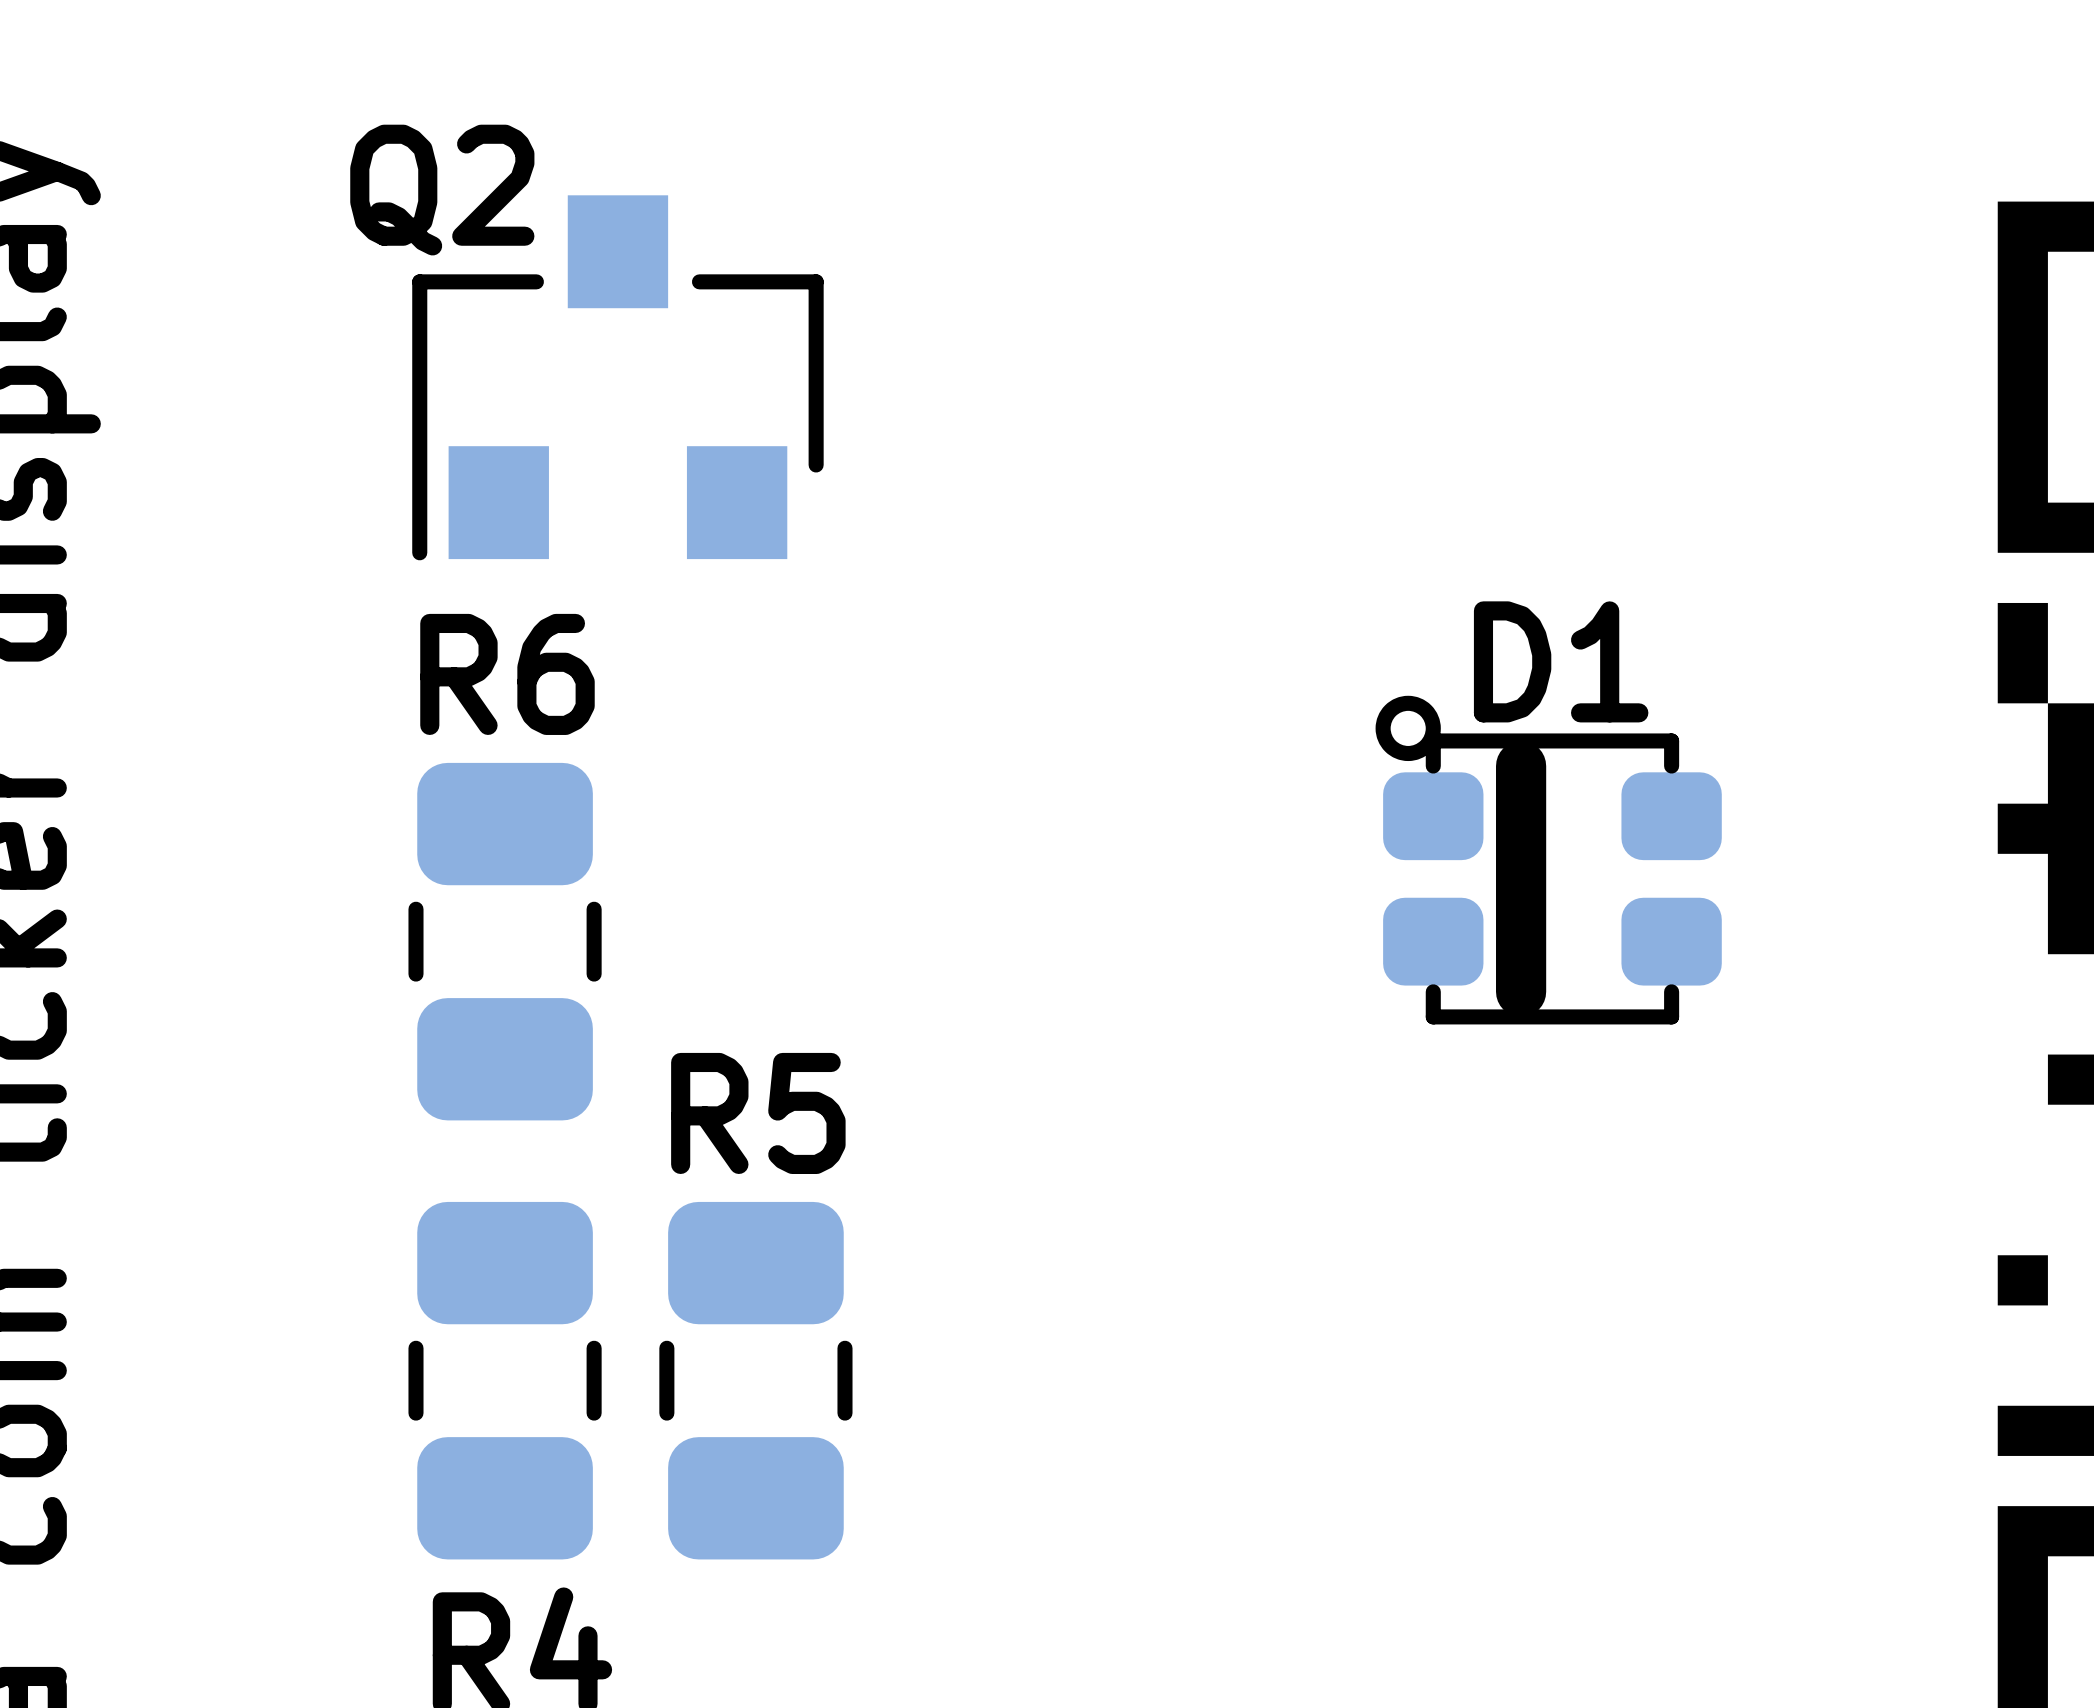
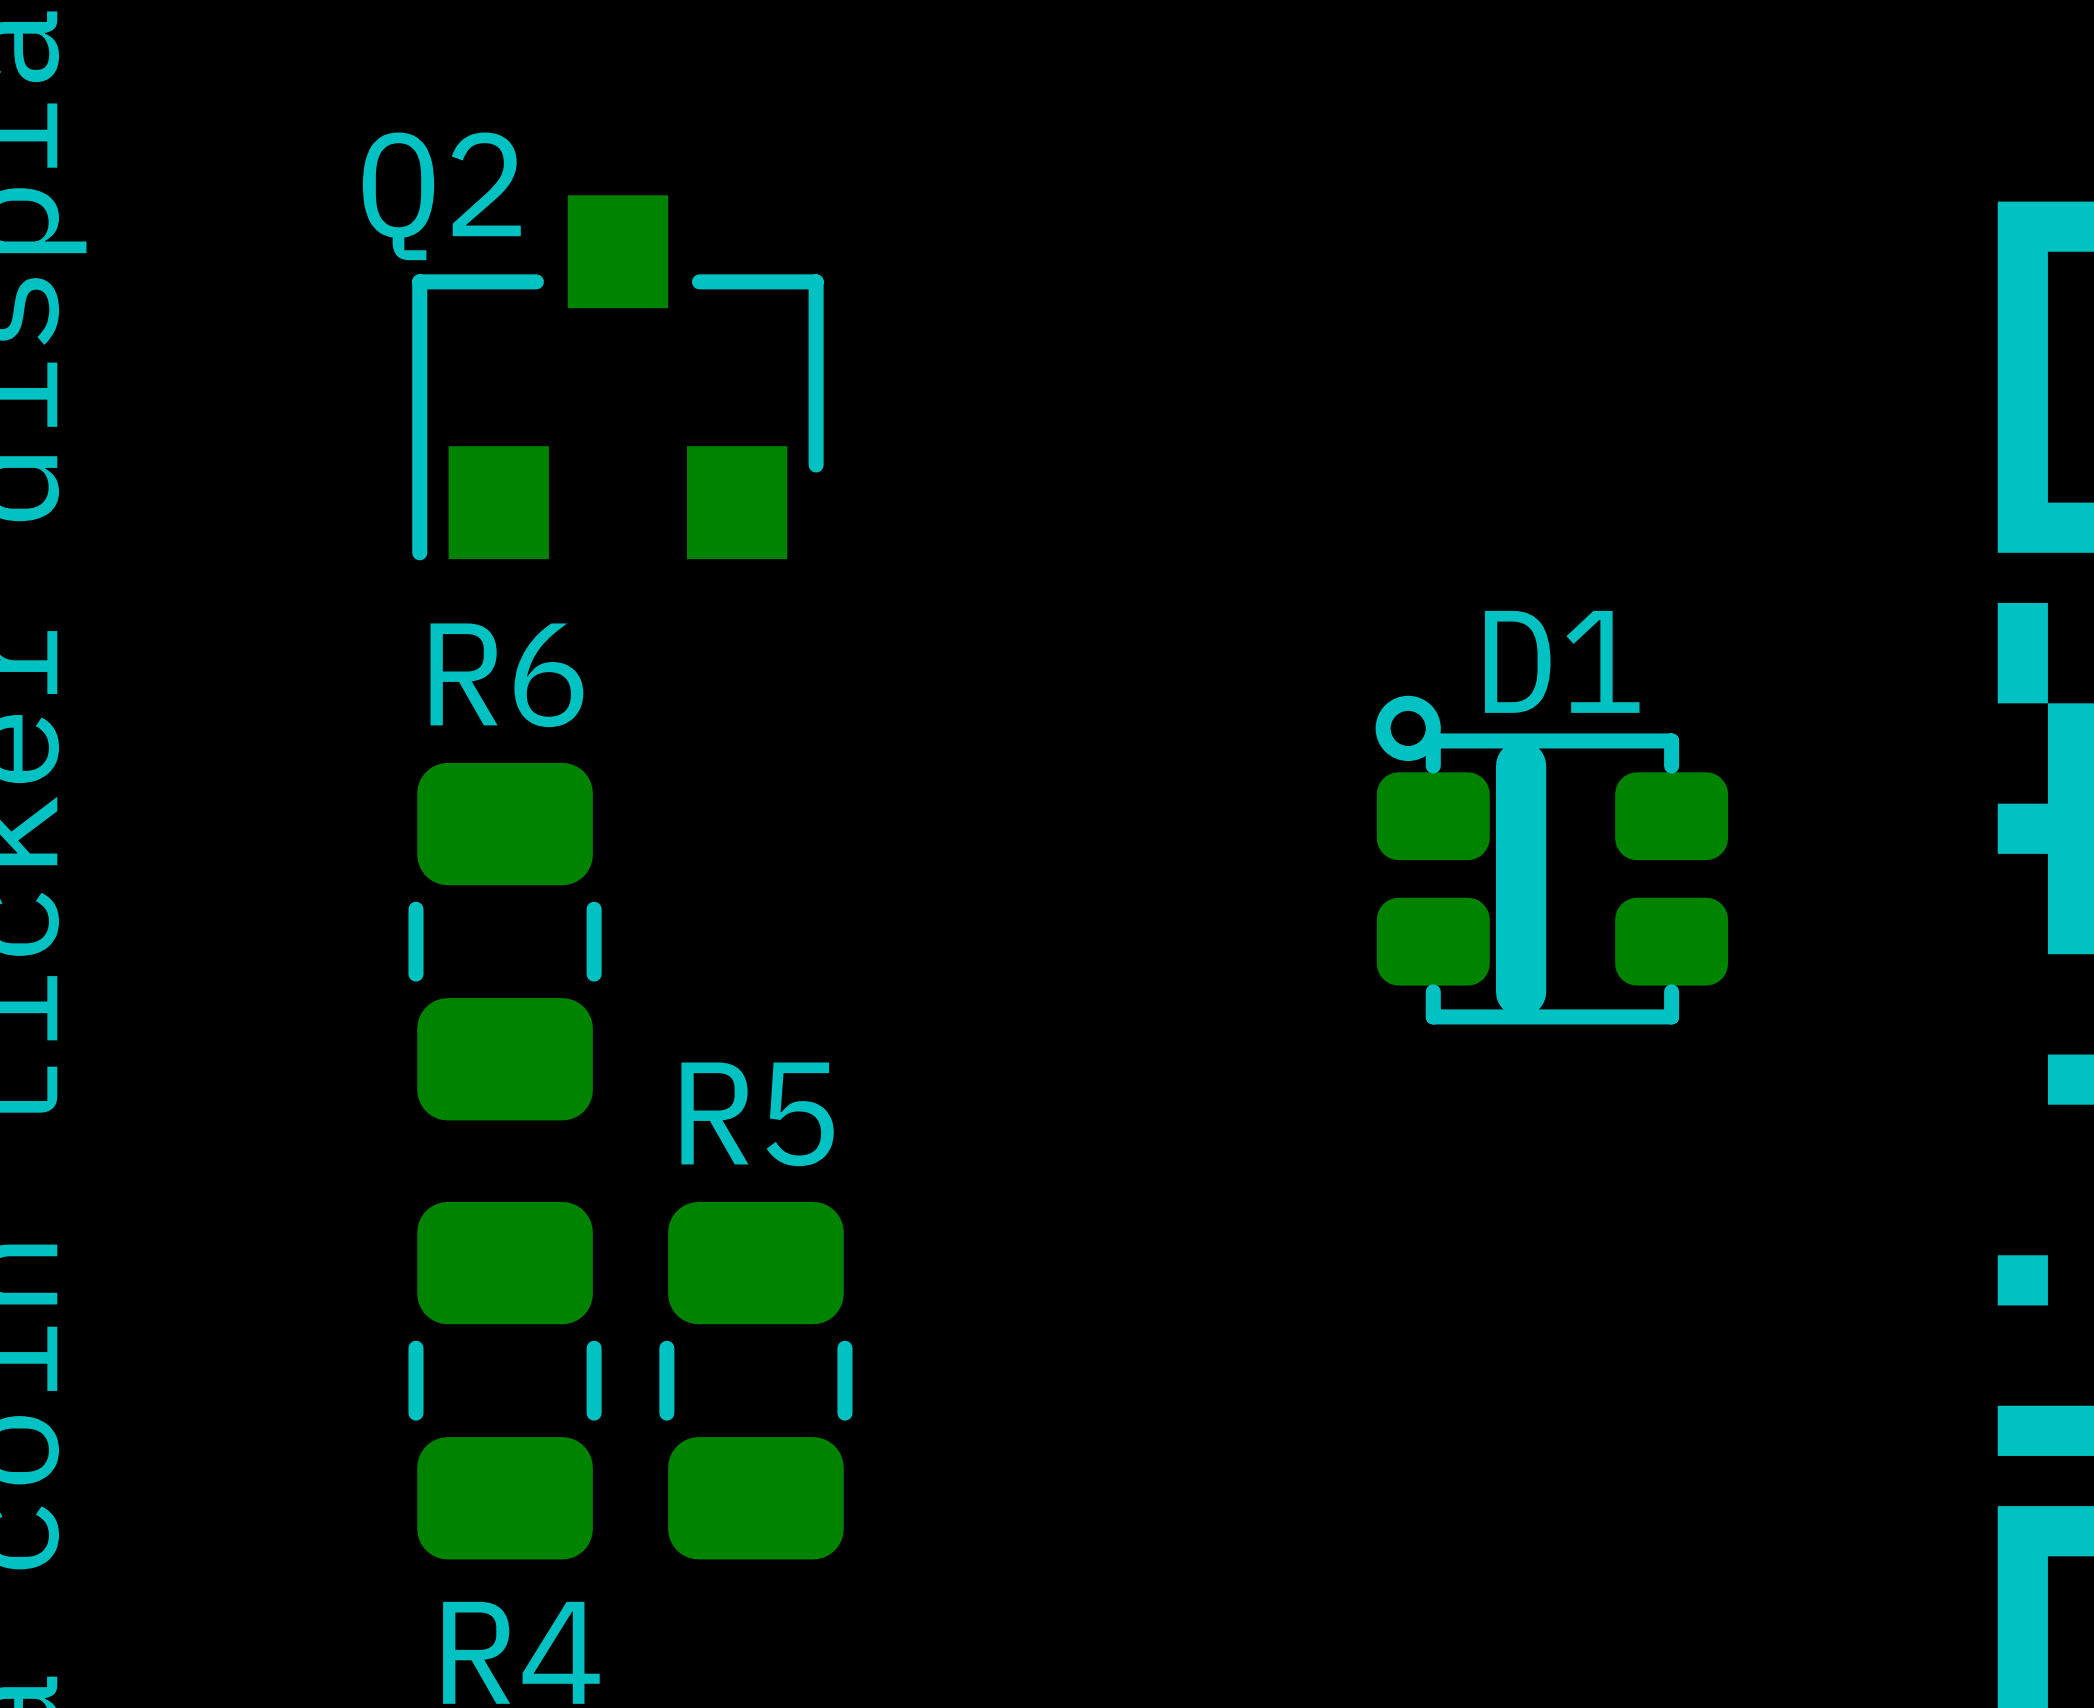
D1 footprint: [1375, 695, 1722, 1025] -> [1375, 695, 1729, 1025]

